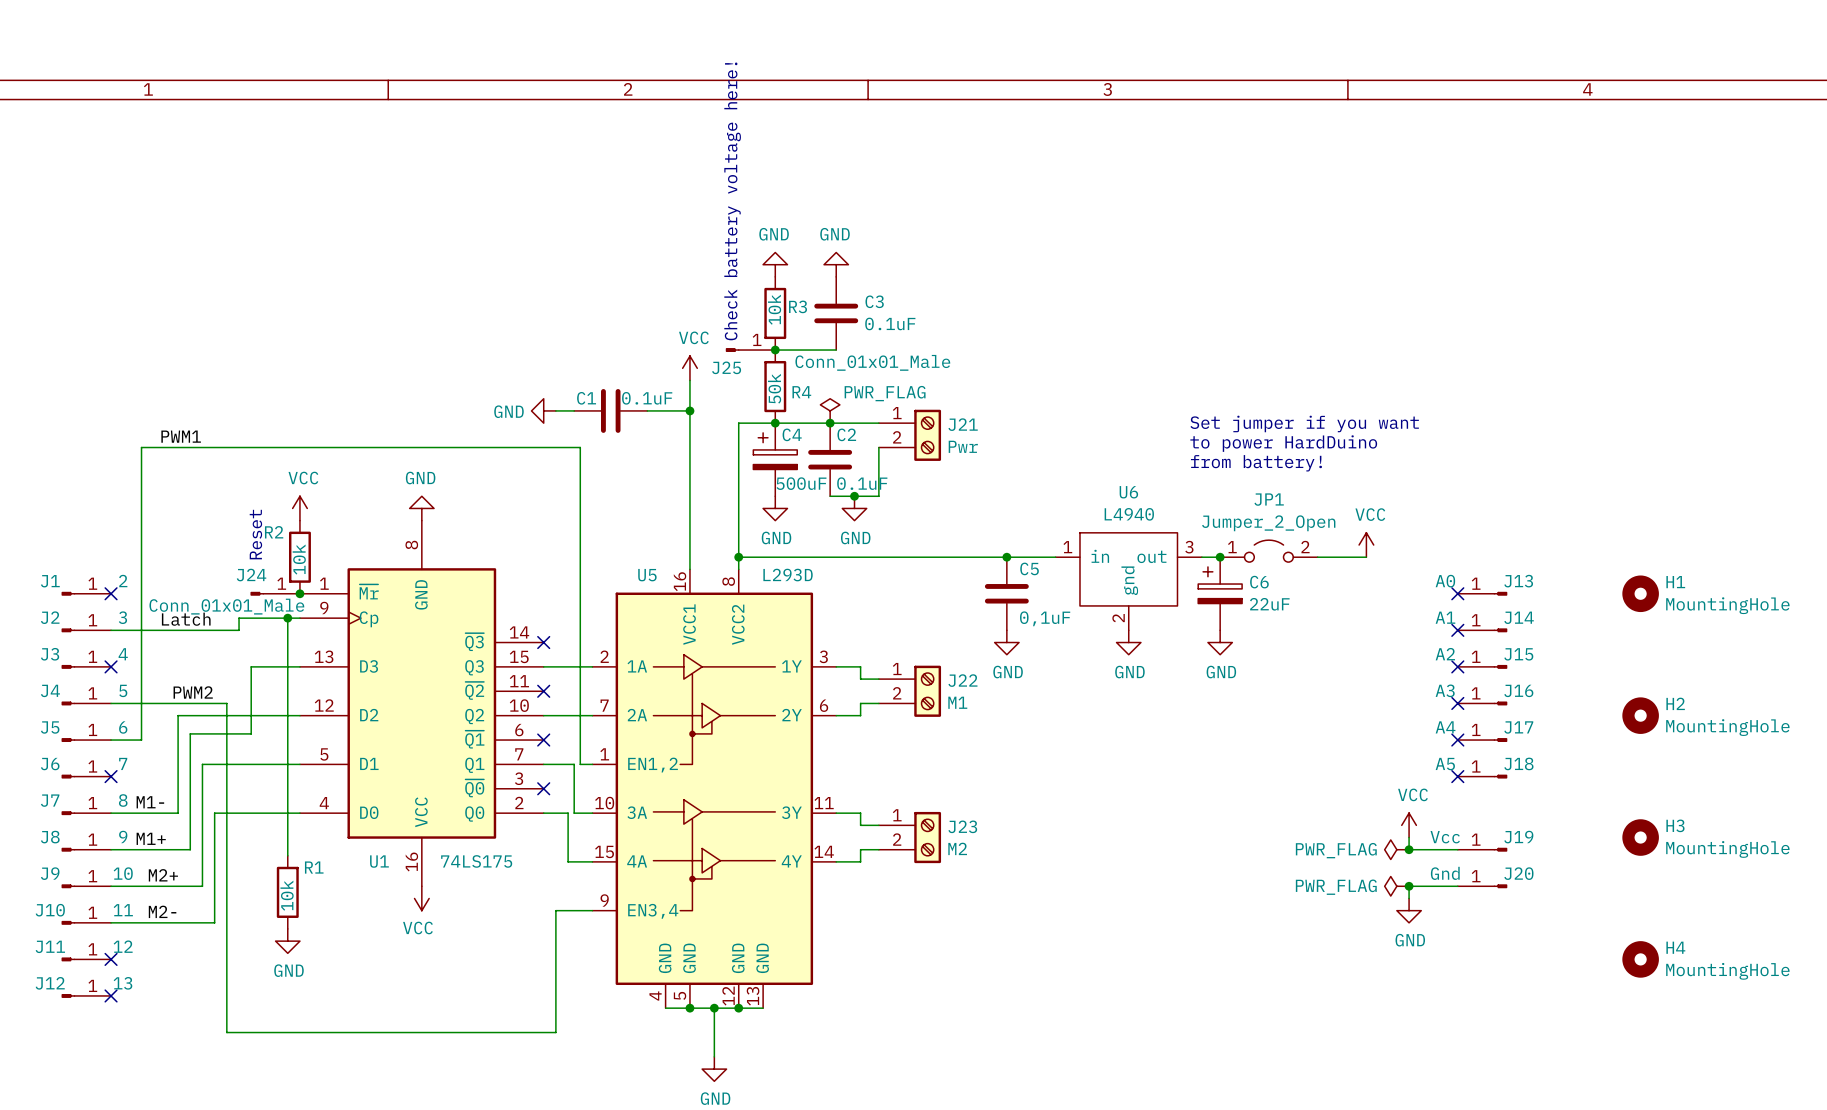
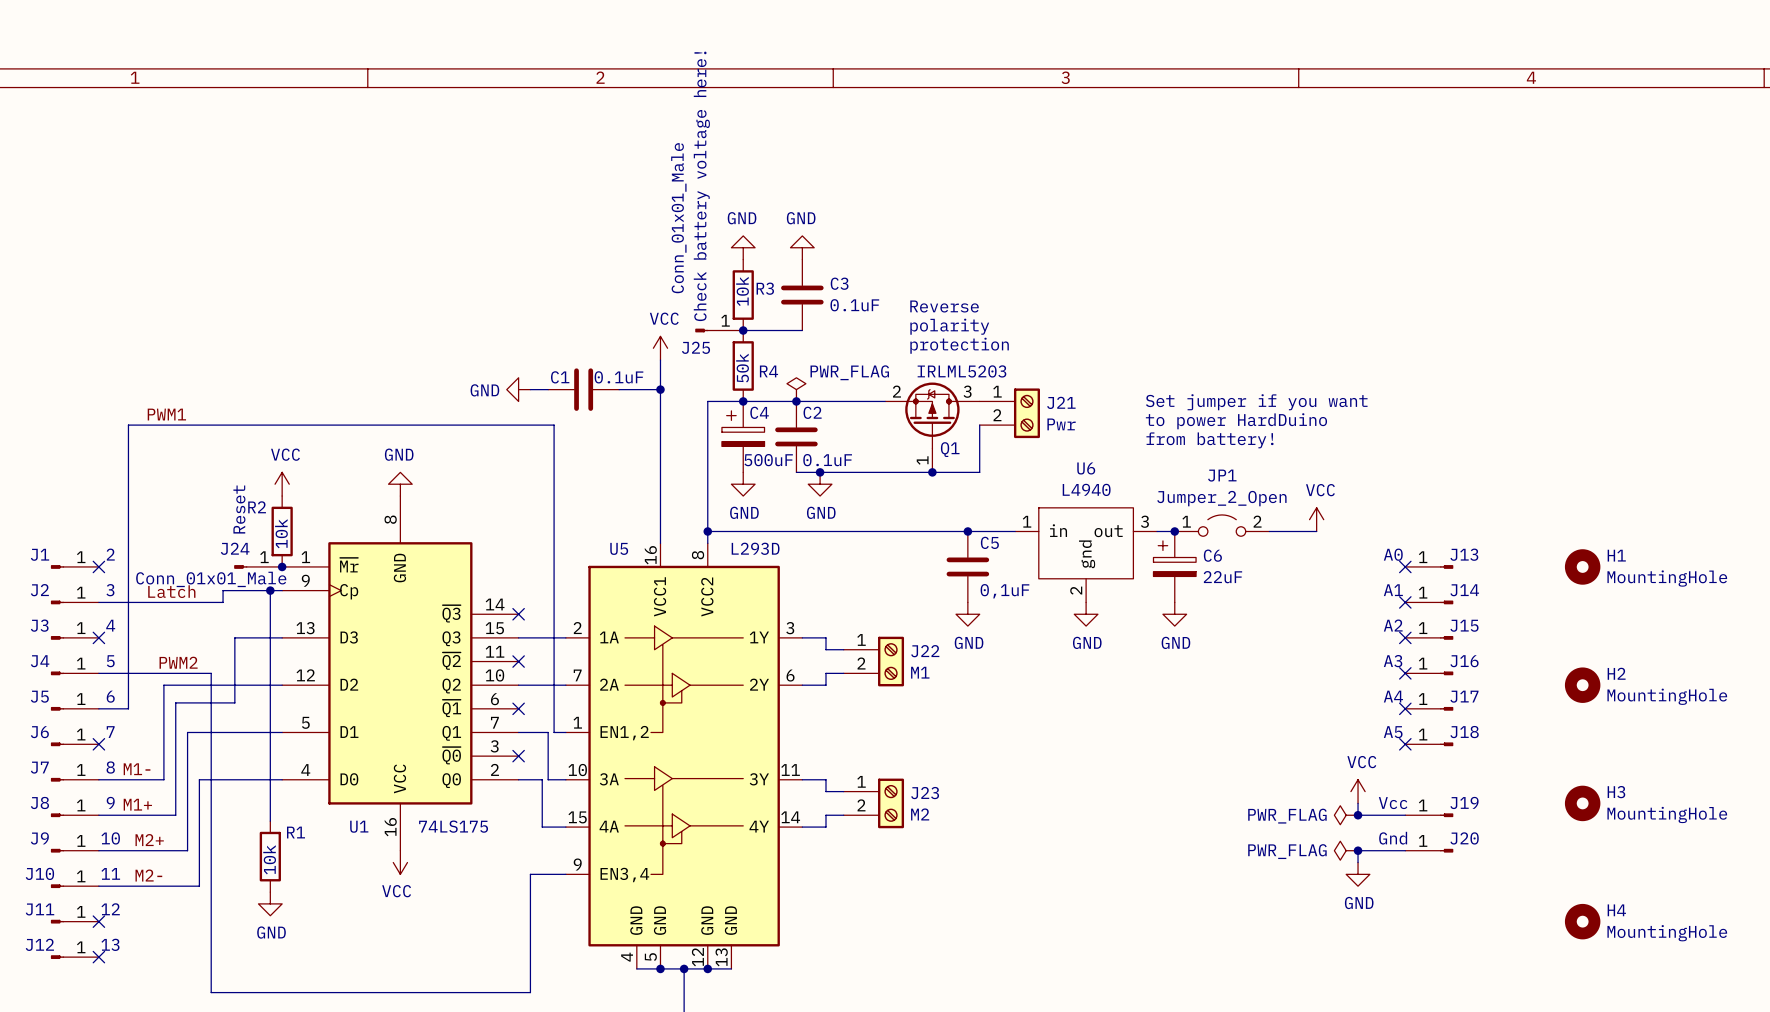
text: none -> Reverse (944, 306)
text: none -> polarity (949, 326)
J25 value rotation: 0° (872, 362) -> 90° counterclockwise (678, 218)
J25 value position: Conn_01x01_Male (872, 362) -> Conn_01x01_Male (678, 218)
text: none -> protection (959, 345)
J21 position: (909, 435) -> (1009, 413)
wire: (878, 447) (878, 496) -> (979, 425) (979, 472) (843, 472)
Q1: none -> IRLML5203 (932, 427)
junction: none -> (932, 472)

